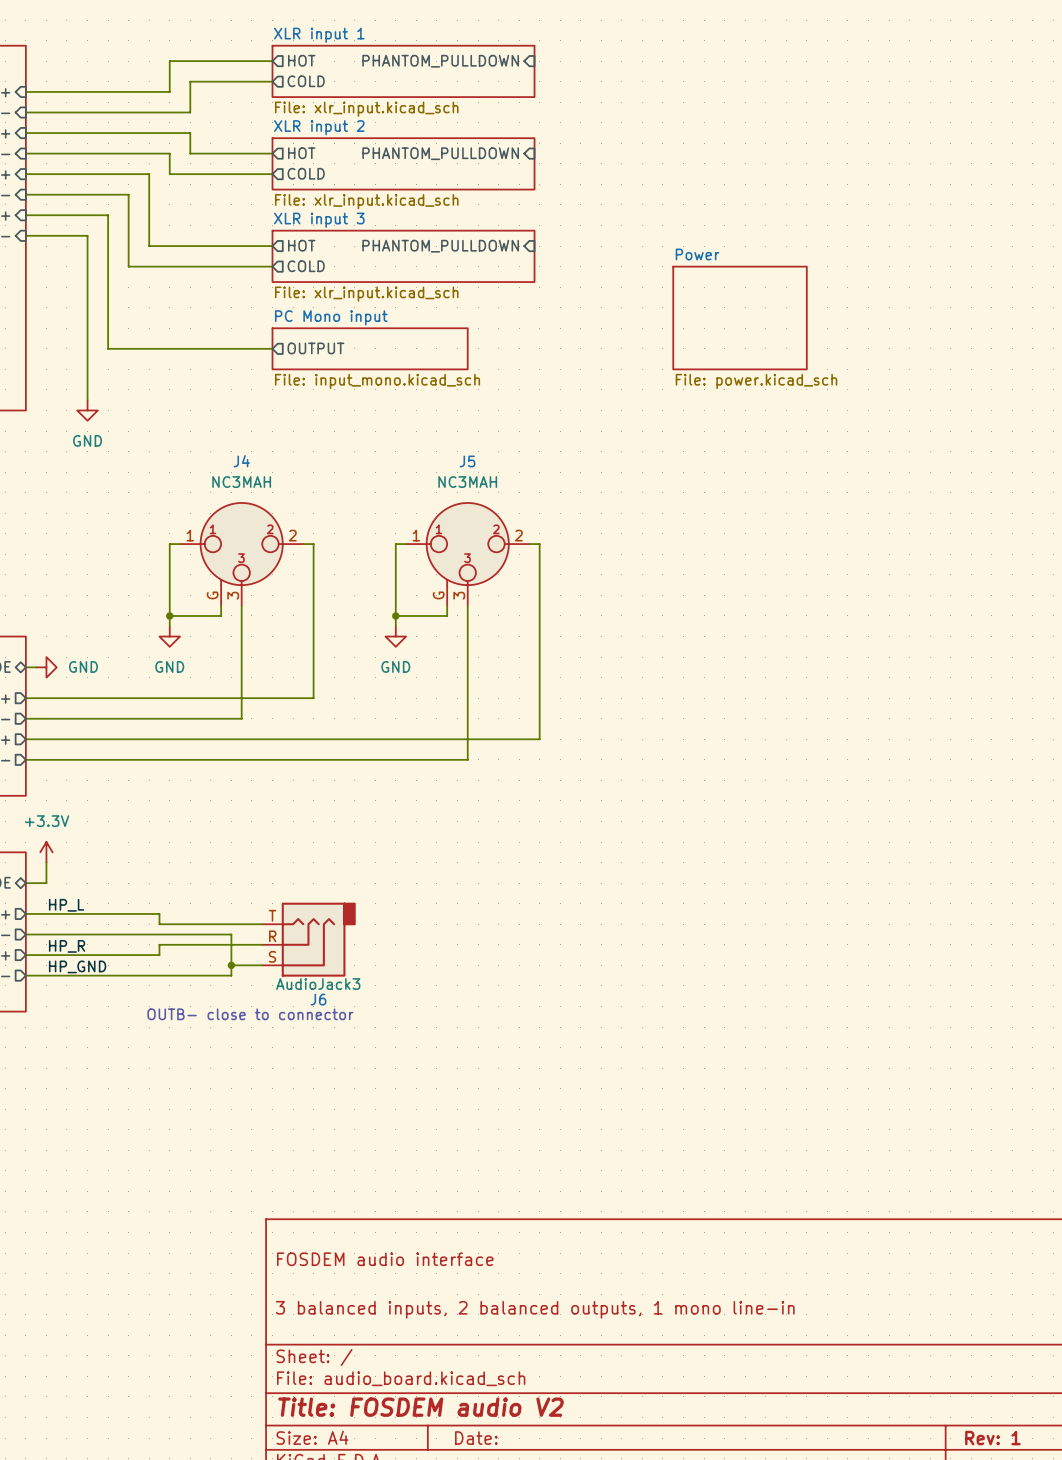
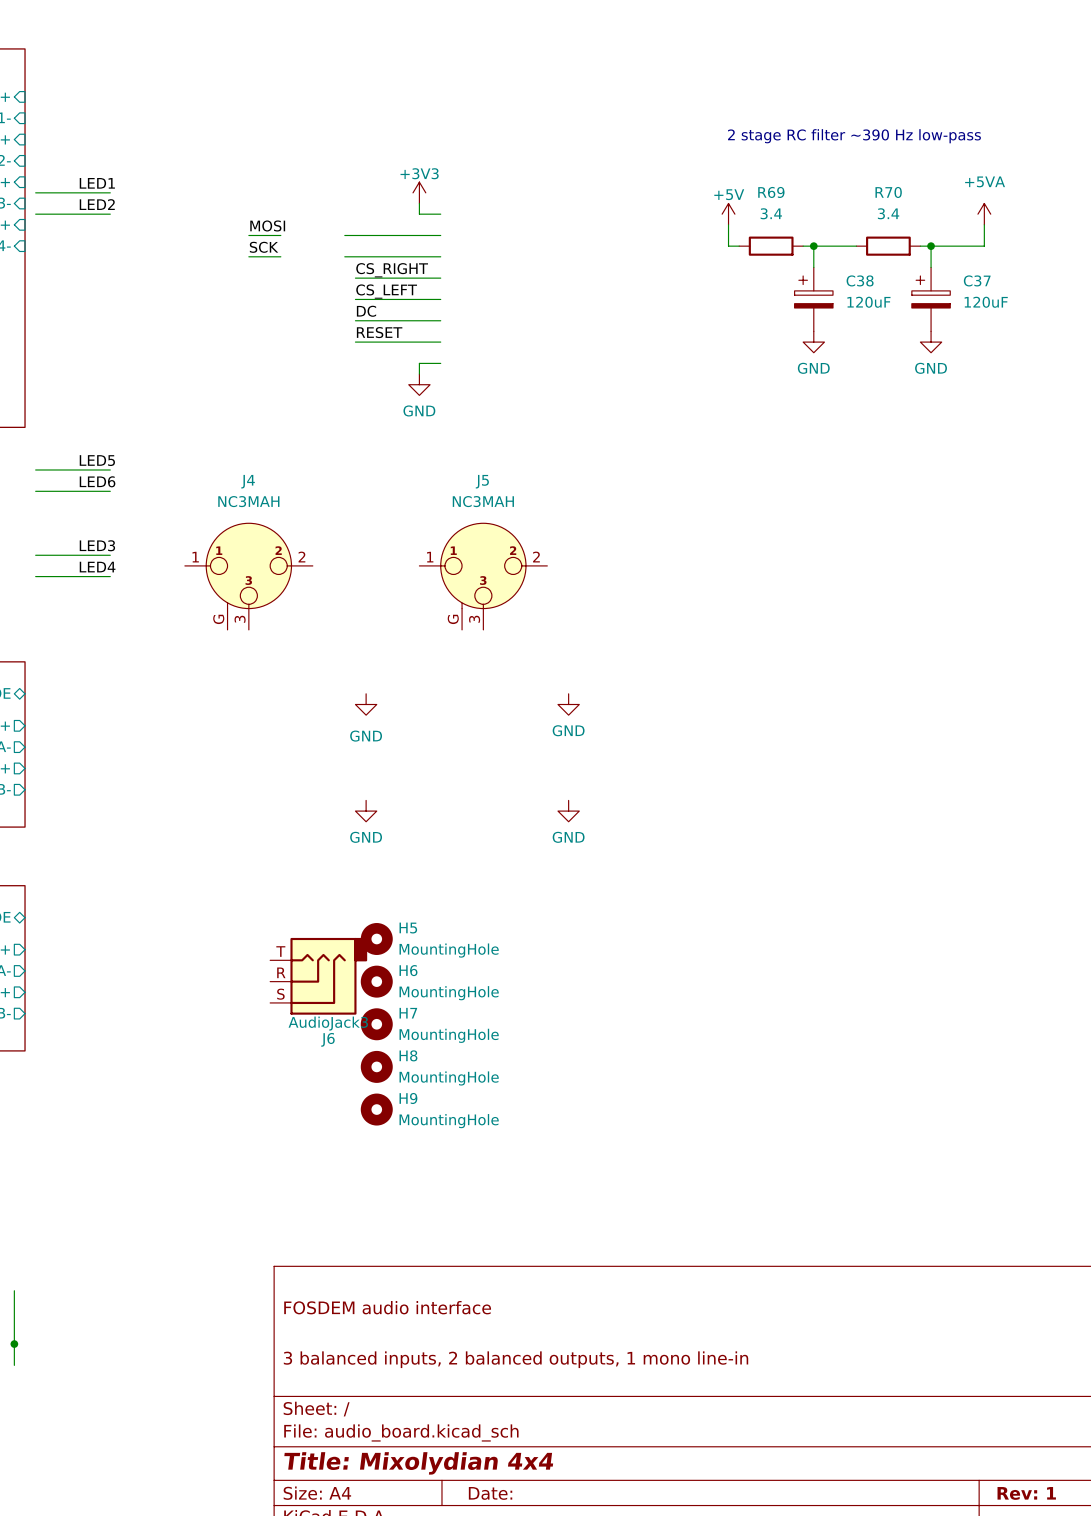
sheet pin: HOT (301, 60) -> none
wire: (272, 61) (169, 61) (169, 91) (25, 91) -> none
sheet pin: PHANTOM_PULLDOWN (440, 61) -> none
sheet XLR input 1: File: xlr_input.kicad_sch (403, 71) -> none
wire: (272, 81) (190, 81) (190, 112) (25, 112) -> none
sheet pin: COLD (306, 81) -> none
text: none -> 2 stage RC filter ~390 Hz low-pass (854, 136)
wire: (25, 133) (190, 133) (190, 153) (272, 153) -> none
wire: (25, 153) (169, 153) (169, 174) (272, 174) -> none
sheet pin: HOT (301, 153) -> none
sheet pin: PHANTOM_PULLDOWN (440, 153) -> none
sheet XLR input 2: File: xlr_input.kicad_sch (403, 163) -> none
sheet pin: COLD (306, 173) -> none
wire: (25, 174) (149, 174) (149, 246) (241, 246) -> none
label: none -> LED1 (97, 183)
wire: none -> (35, 192) (110, 192)
power symbol: none -> +3V3 (419, 192)
wire: (25, 194) (128, 194) (128, 266) (272, 266) -> none
wire: none -> (419, 203) (419, 214) (440, 214)
label: none -> LED2 (97, 204)
wire: none -> (35, 214) (110, 214)
power symbol: none -> +5V (728, 214)
power symbol: none -> +5VA (984, 214)
wire: (25, 215) (108, 215) (108, 348) (272, 348) -> none
wire: none -> (728, 224) (728, 246) (739, 246)
wire: none -> (984, 224) (984, 246) (920, 246)
label: none -> MOSI (267, 225)
wire: none -> (248, 235) (280, 235)
wire: none -> (344, 235) (440, 235)
wire: (25, 235) (87, 235) (87, 400) -> none
R69: none -> 3.4 (771, 246)
wire: none -> (803, 246) (856, 246)
wire: none -> (813, 246) (813, 267)
junction: none -> (813, 246)
R70: none -> 3.4 (888, 246)
wire: none -> (931, 246) (931, 267)
junction: none -> (931, 246)
label: none -> SCK (264, 247)
sheet pin: HOT (301, 245) -> none
wire: none -> (344, 256) (440, 256)
sheet pin: PHANTOM_PULLDOWN (440, 246) -> none
sheet XLR input 3: File: xlr_input.kicad_sch (403, 256) -> none
label: none -> CS_RIGHT (392, 270)
sheet pin: COLD (306, 266) -> none
wire: none -> (355, 278) (440, 278)
label: none -> CS_LEFT (386, 291)
wire: none -> (355, 299) (440, 299)
C38: none -> 120uF (813, 299)
C37: none -> 120uF (931, 299)
label: none -> DC (366, 311)
wire: none -> (355, 320) (440, 320)
sheet Power: File: power.kicad_sch (740, 318) -> none
label: none -> RESET (379, 332)
power symbol: none -> GND (813, 342)
power symbol: none -> GND (931, 342)
sheet pin: OUTPUT (315, 348) -> none
sheet PC Mono input: File: input_mono.kicad_sch (370, 348) -> none
wire: none -> (440, 363) (419, 363) (419, 374)
power symbol: none -> GND (419, 384)
power symbol: GND (87, 410) -> none
label: none -> LED5 (97, 460)
wire: none -> (35, 469) (110, 469)
label: none -> LED6 (97, 481)
wire: none -> (35, 491) (110, 491)
label: none -> LED3 (97, 545)
wire: none -> (35, 555) (110, 555)
label: none -> LED4 (97, 567)
wire: (180, 544) (169, 544) (169, 626) -> none
wire: (303, 544) (313, 544) (313, 698) (25, 698) -> none
wire: (406, 544) (395, 544) (395, 626) -> none
wire: (529, 544) (539, 544) (539, 739) (25, 739) -> none
wire: none -> (35, 576) (110, 576)
wire: (221, 605) (221, 615) (169, 615) -> none
wire: (241, 605) (241, 718) (25, 718) -> none
wire: (447, 605) (447, 615) (395, 615) -> none
wire: (467, 605) (467, 759) (25, 759) -> none
junction: (169, 615) -> none
junction: (395, 615) -> none
power symbol: GND (169, 636) -> none
power symbol position: GND (395, 636) -> GND (366, 704)
wire: (25, 667) (36, 667) -> none
power symbol: GND (46, 667) -> none
power symbol: none -> GND (568, 704)
power symbol: none -> GND (366, 811)
power symbol: none -> GND (568, 811)
power symbol: +3.3V (46, 852) -> none
wire: (46, 862) (46, 883) (25, 883) -> none
H5: none -> MountingHole (376, 939)
label: HP_L (66, 905) -> none
wire: (25, 913) (159, 913) (159, 924) (262, 924) -> none
wire: (25, 934) (231, 934) (231, 975) (25, 975) -> none
wire: (262, 944) (159, 944) (159, 955) (25, 955) -> none
H6: none -> MountingHole (376, 981)
label: HP_R (67, 946) -> none
wire: (231, 965) (262, 965) -> none
junction: (231, 965) -> none
label: HP_GND (77, 966) -> none
H7: none -> MountingHole (376, 1024)
text: OUTB- close to connector (250, 1014) -> none
H8: none -> MountingHole (376, 1066)
H9: none -> MountingHole (376, 1109)
wire: none -> (14, 1290) (14, 1365)
junction: none -> (14, 1344)
title block: Title: FOSDEM audio V2 (421, 1407) -> Title: Mixolydian 4x4 (418, 1463)

